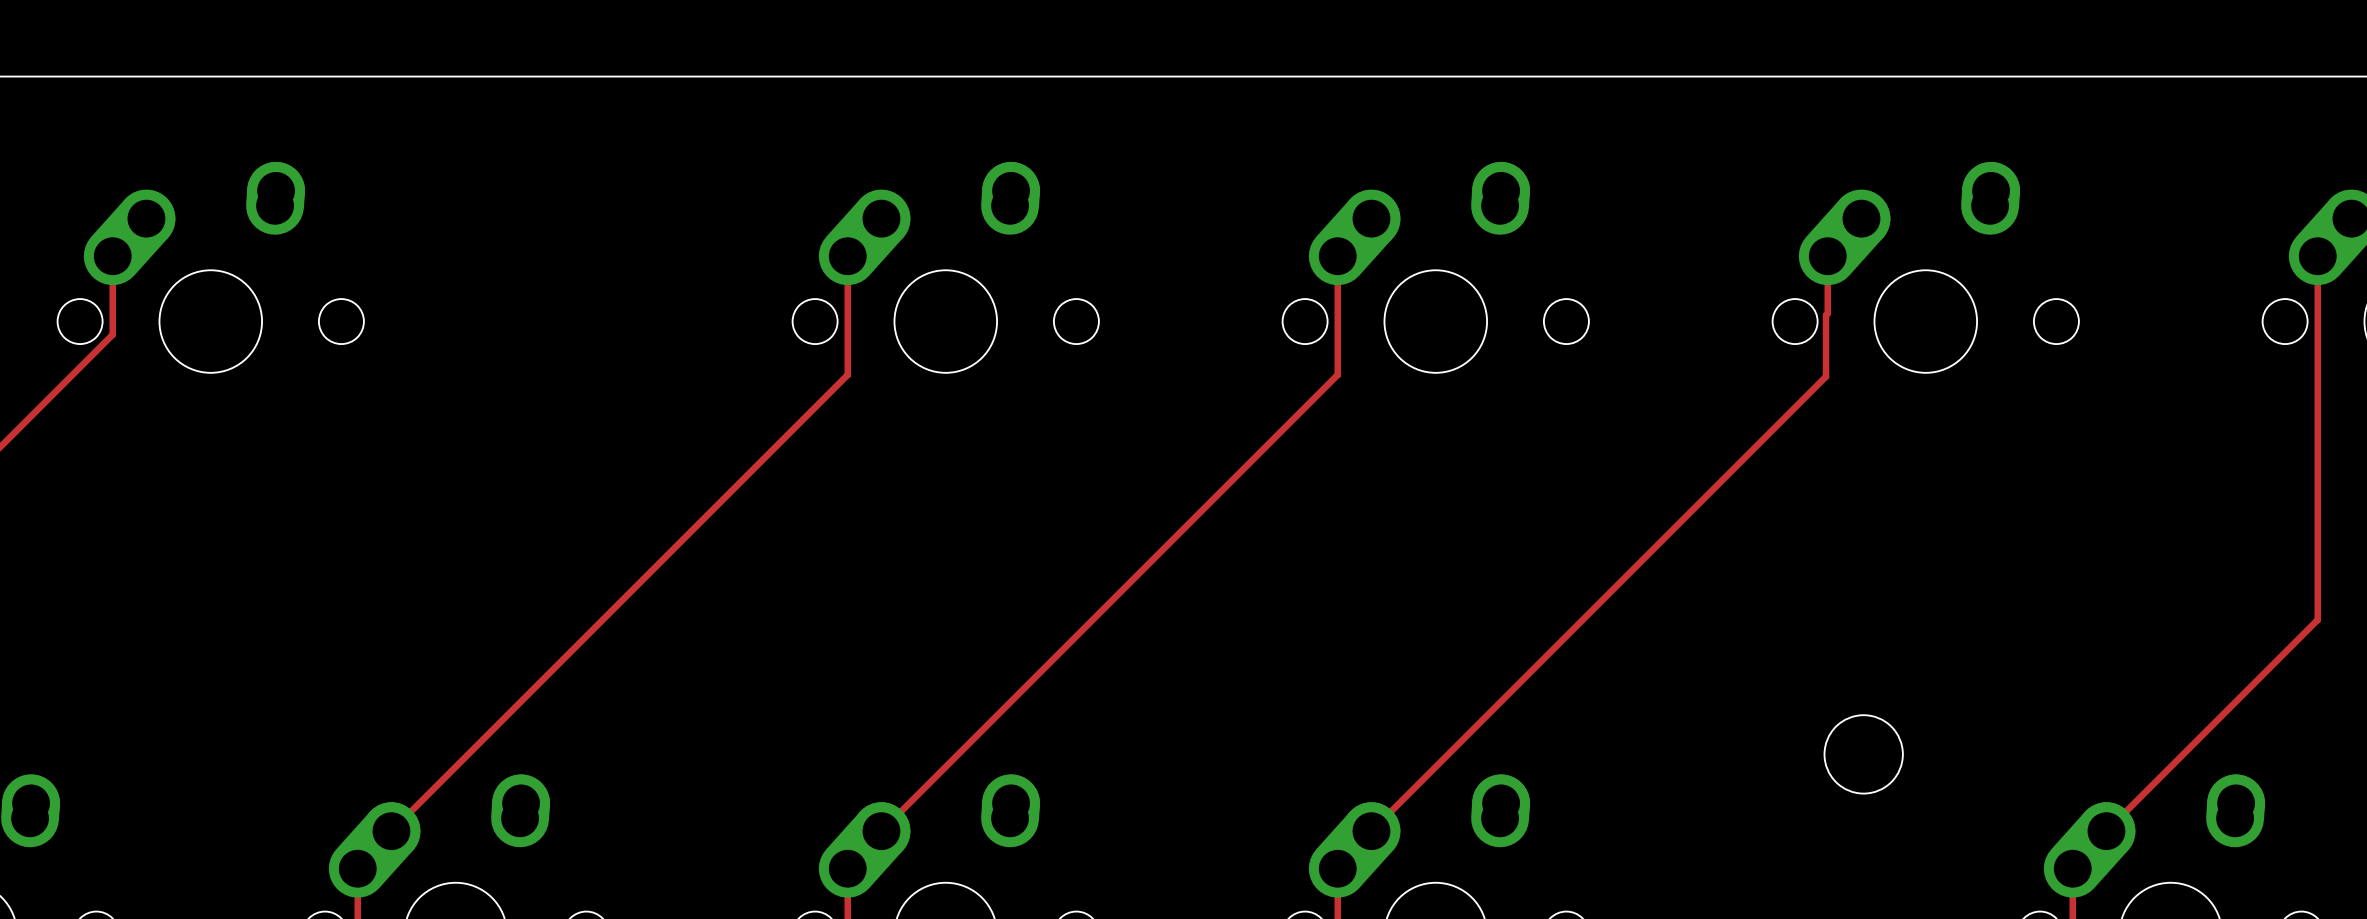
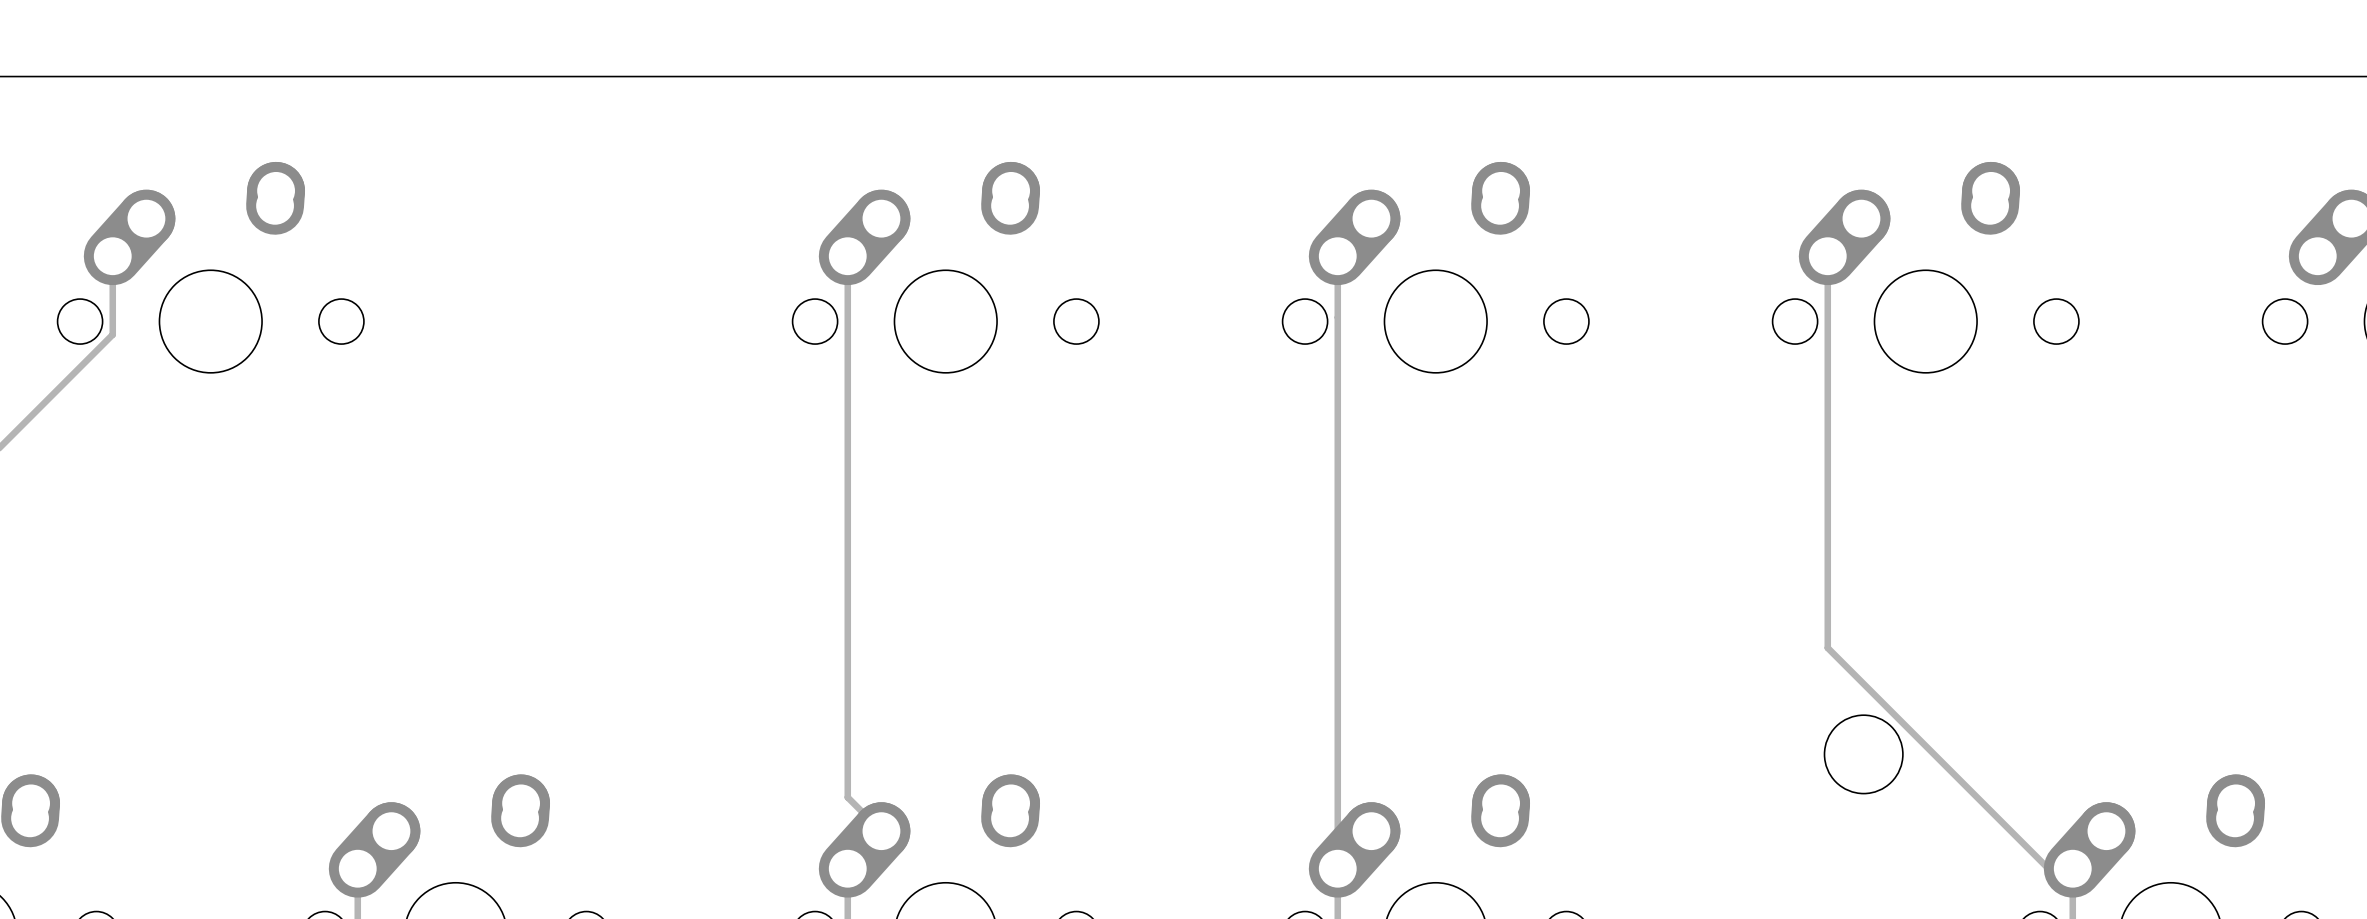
track: (2317, 256) (2317, 619) (2106, 831) -> none
track: (1827, 313) (1826, 315) (1826, 376) (1371, 831) -> (1827, 313) (1827, 647) (2048, 868) (2072, 868)
track: (847, 374) (391, 831) -> (847, 374) (847, 797) (881, 831)
track: (1337, 374) (881, 831) -> (1337, 374) (1337, 868)

